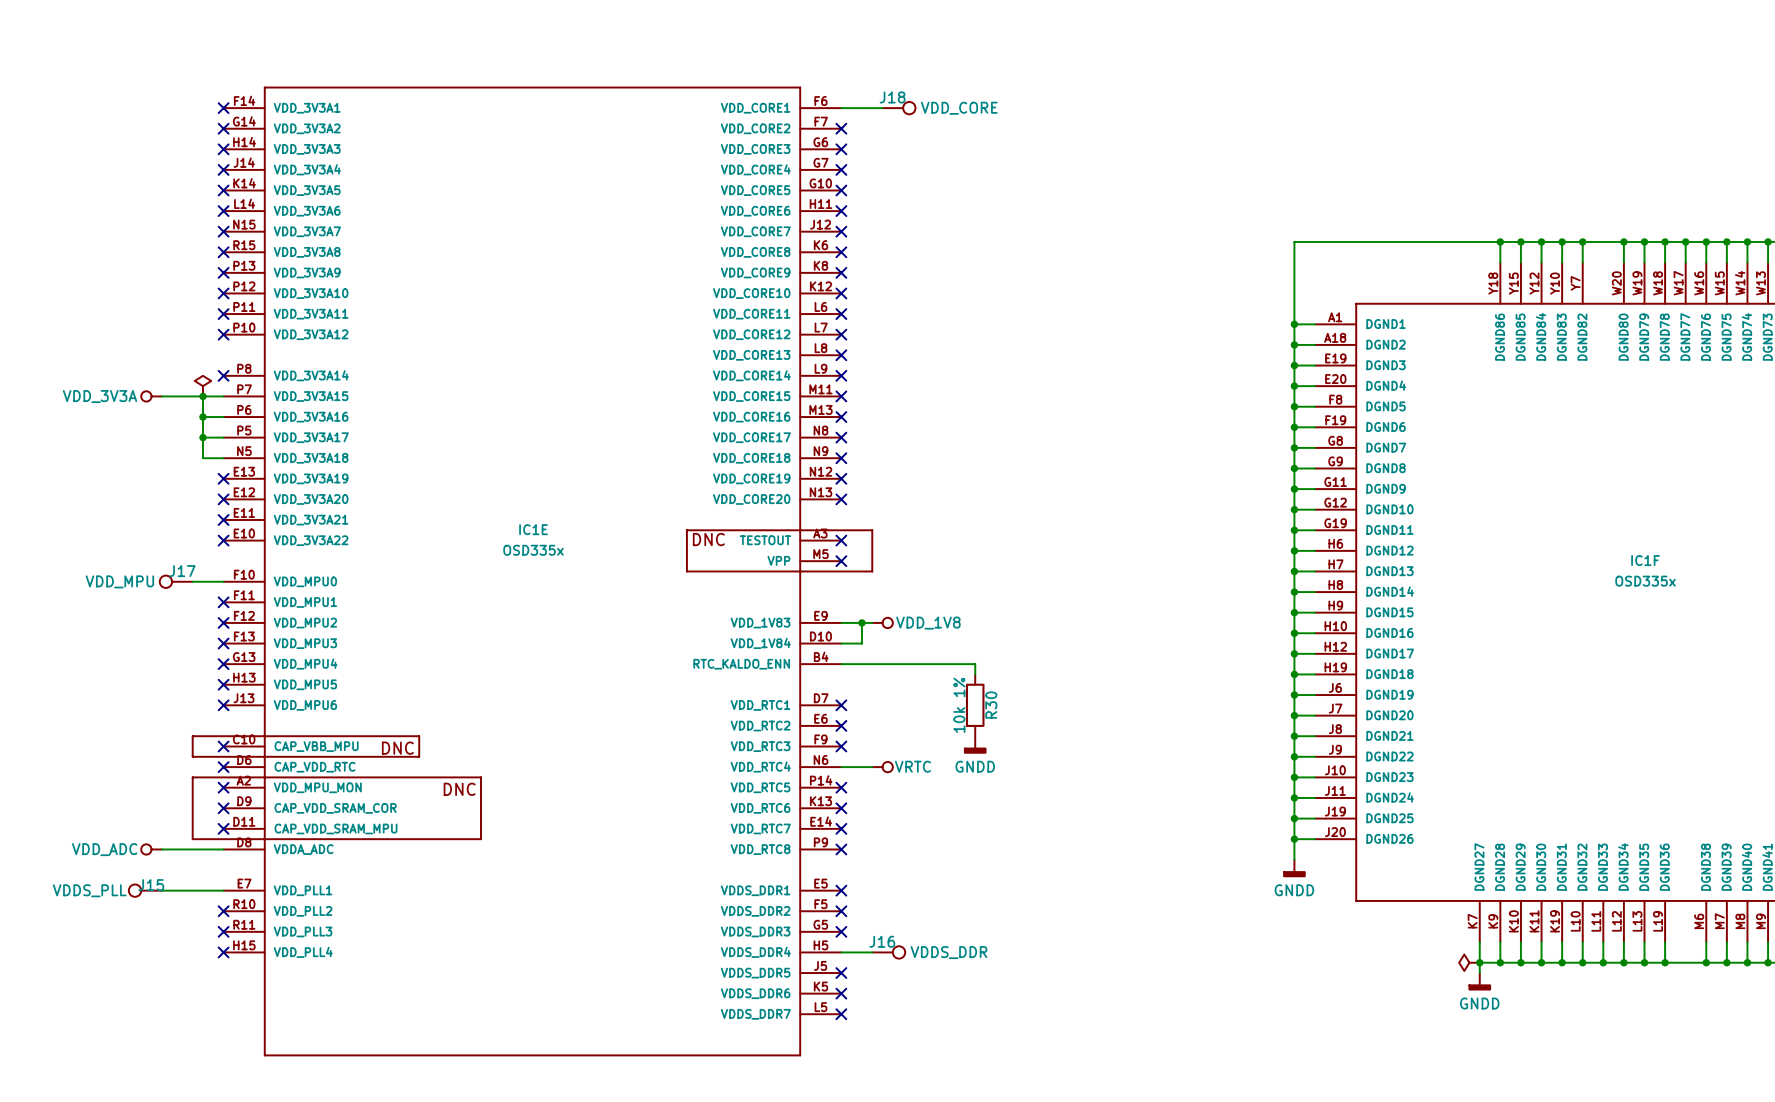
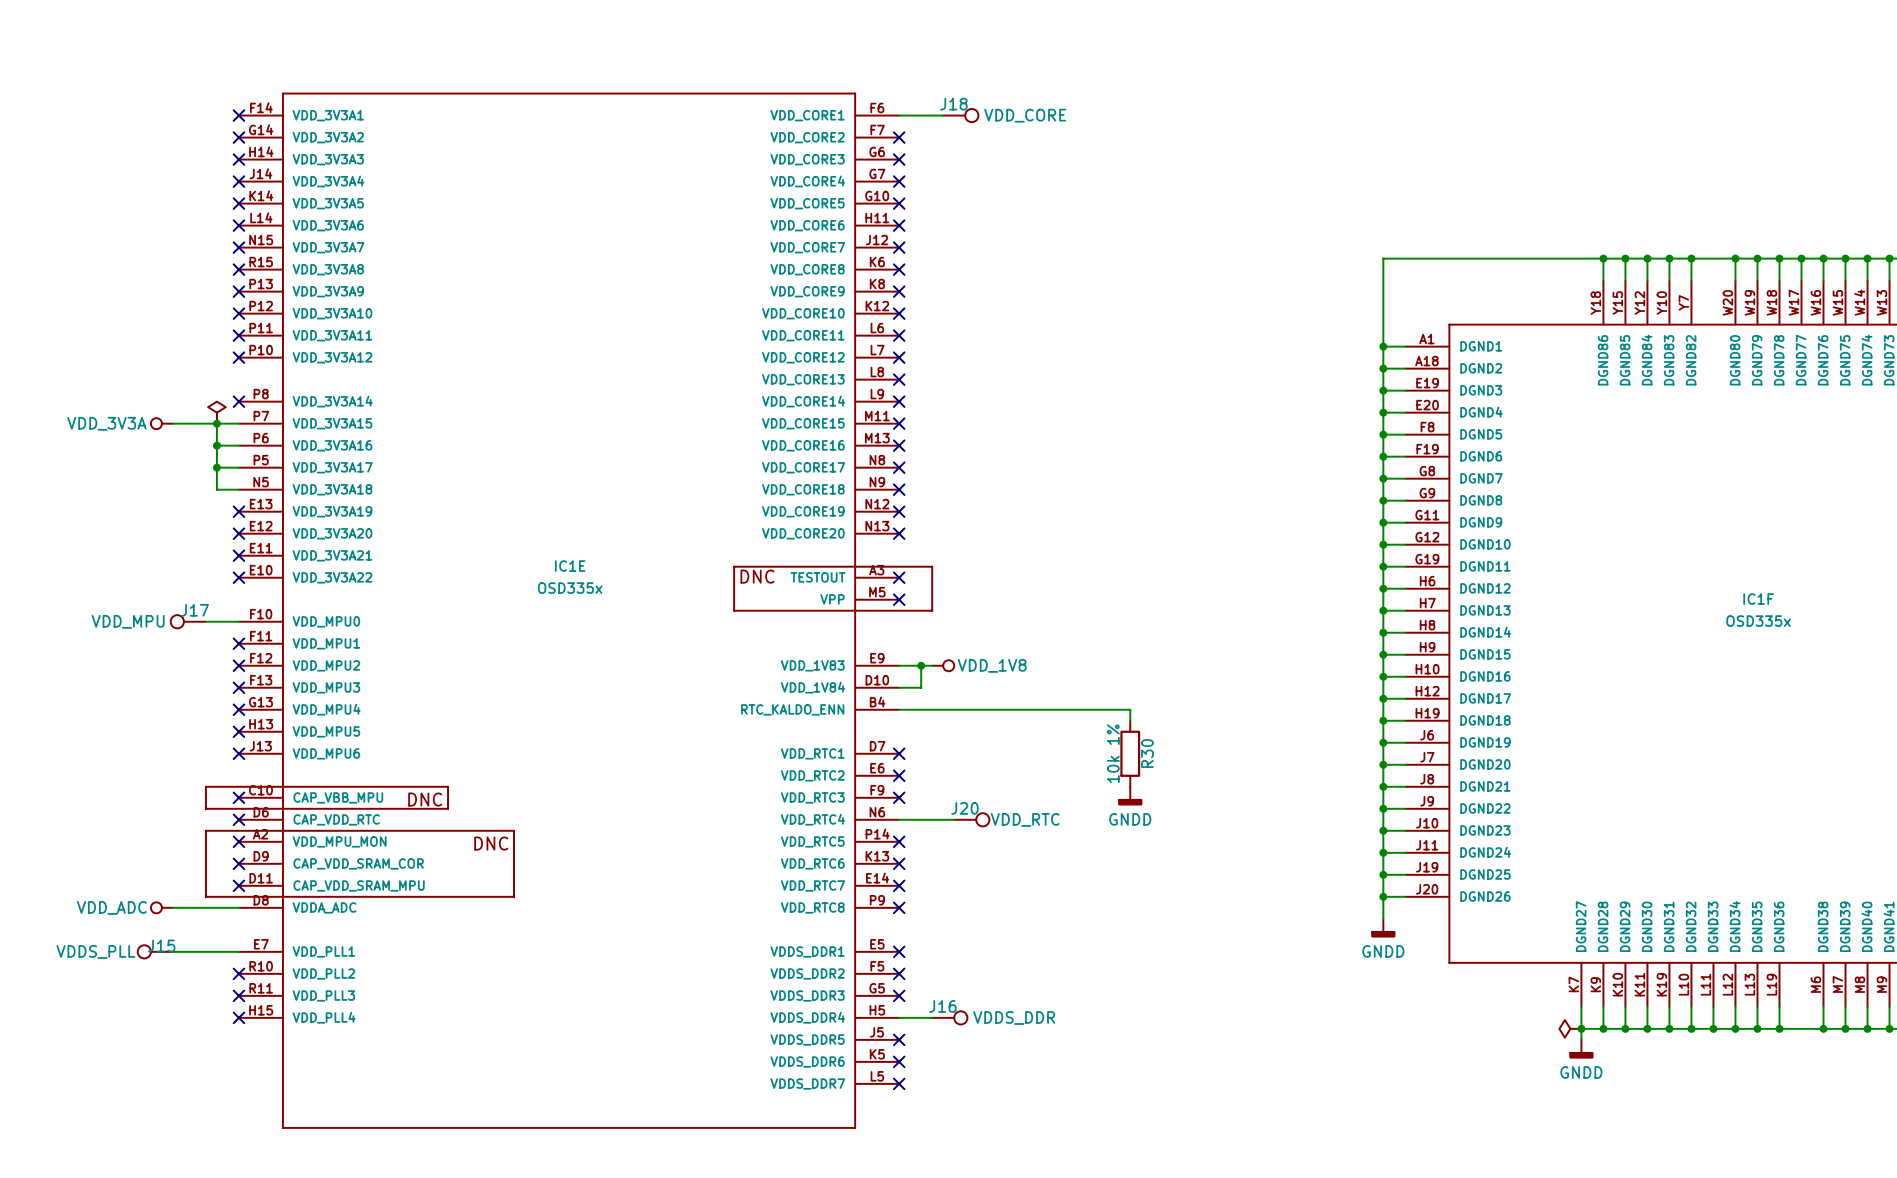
wire: (975, 664) (975, 674) -> (1042, 709) (1130, 709) (1130, 720)
R30 position: (975, 705) -> (1130, 753)
power symbol position: GNDD (975, 744) -> GNDD (1130, 796)
power symbol: VRTC (882, 767) -> none
J20: none -> VDD_RTC (971, 819)

